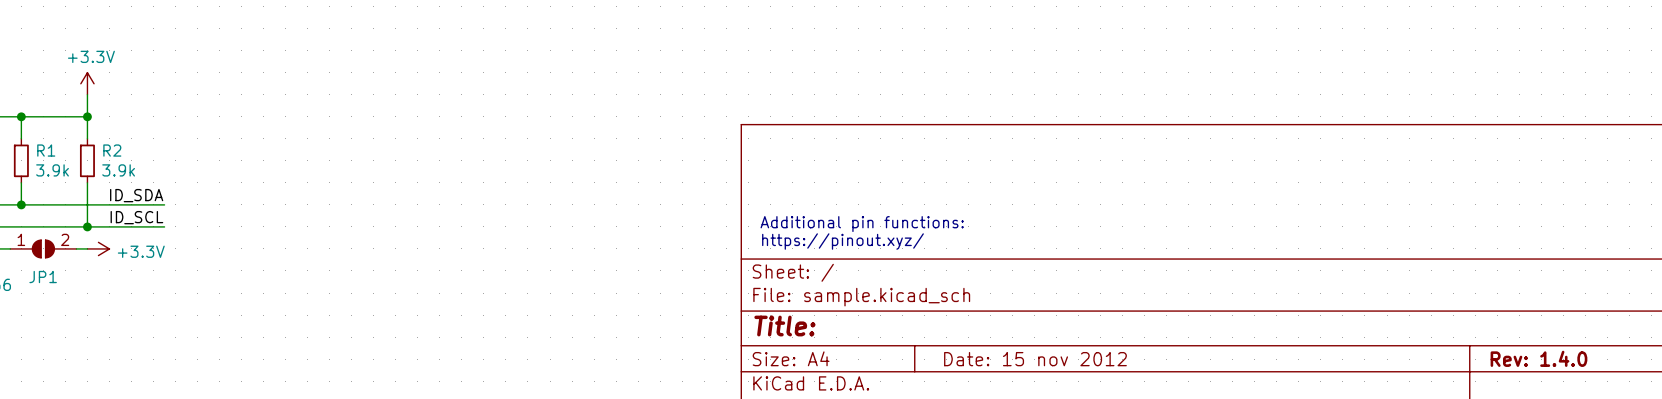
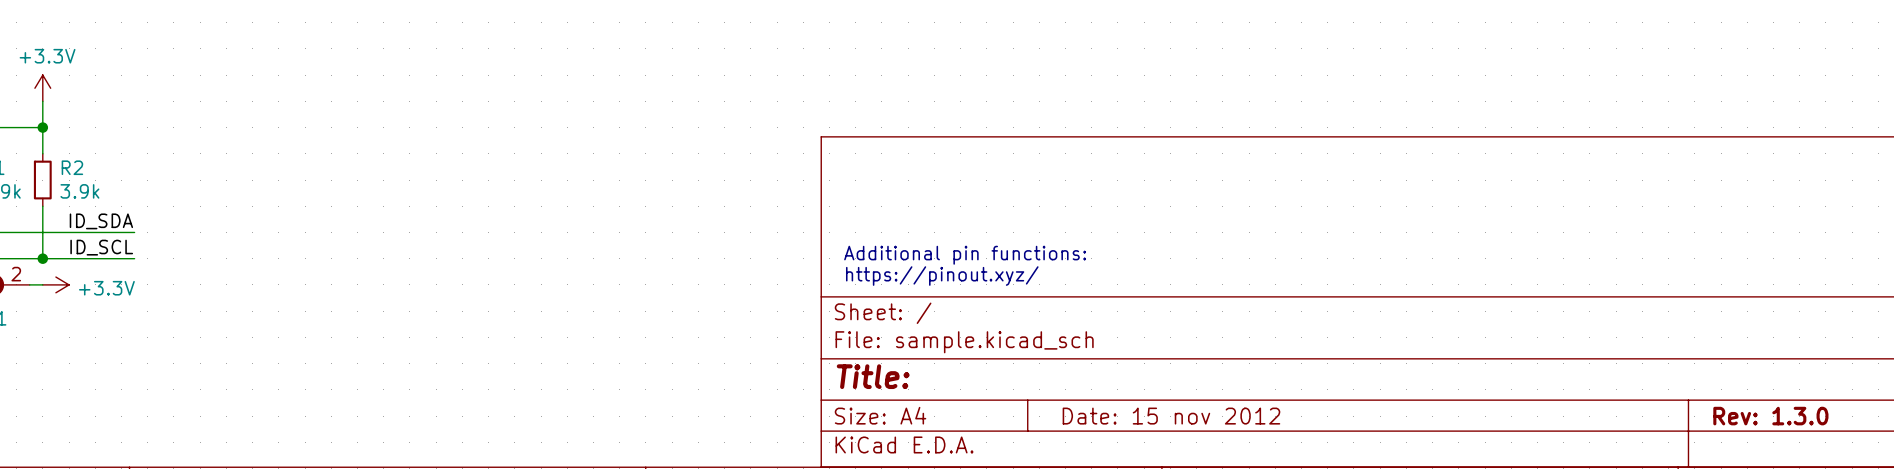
title block: Rev: 1.4.0 (1538, 358) -> Rev: 1.3.0 (1770, 416)

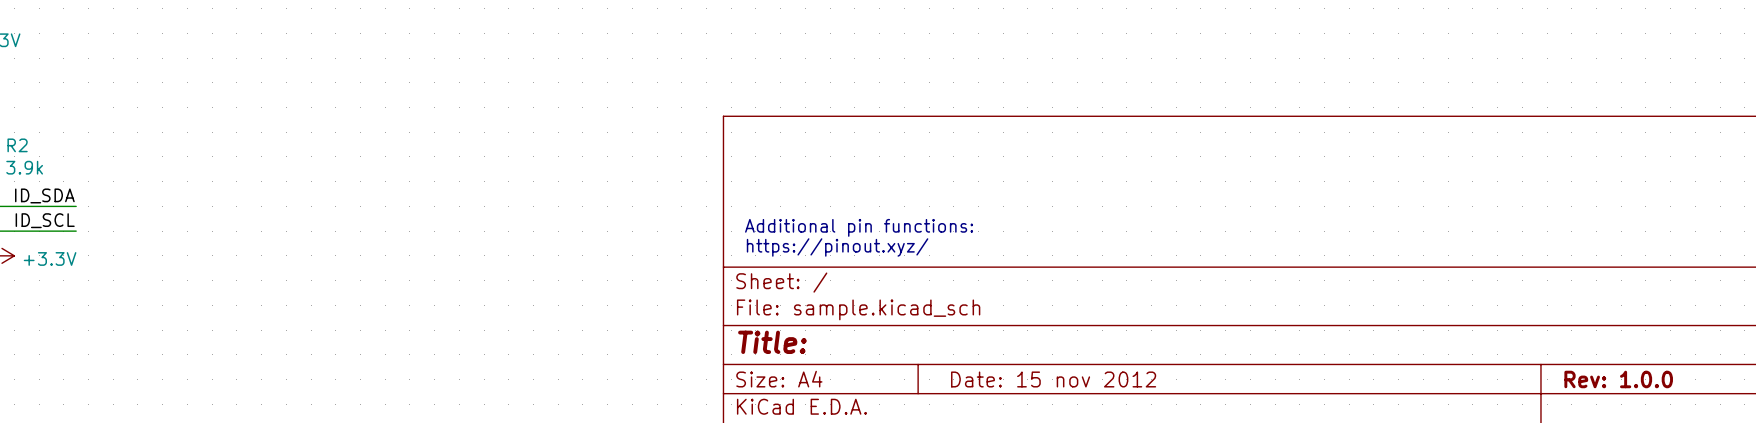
title block: Rev: 1.3.0 (1770, 416) -> Rev: 1.0.0 (1618, 379)

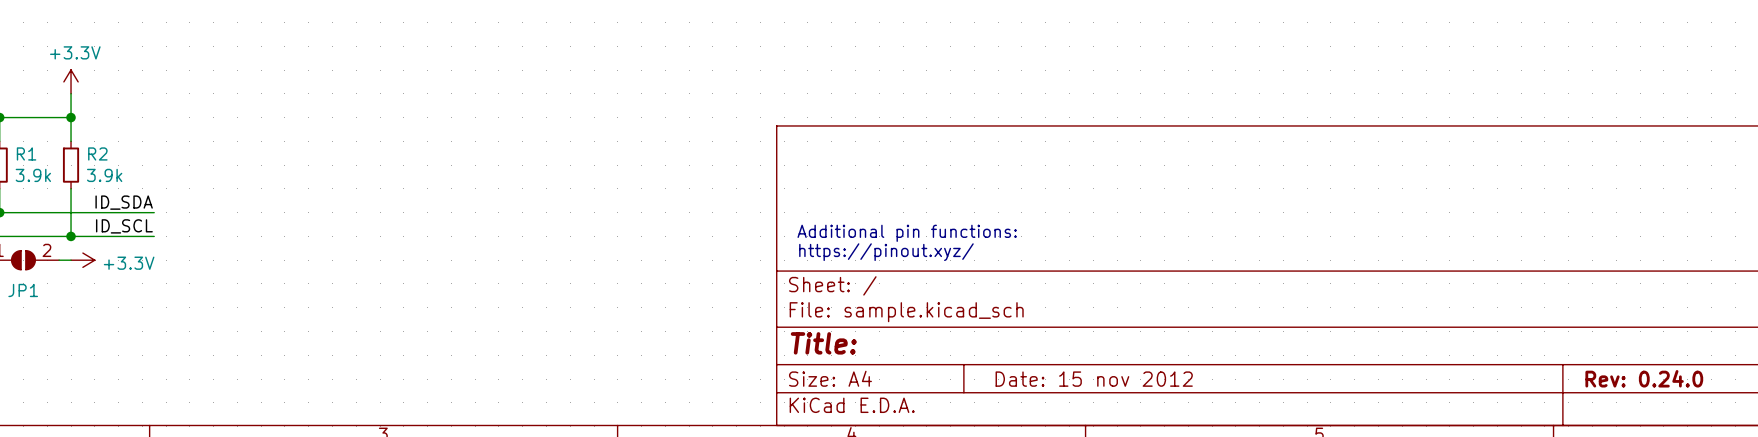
title block: Rev: 1.0.0 (1618, 379) -> Rev: 0.24.0 (1644, 378)

